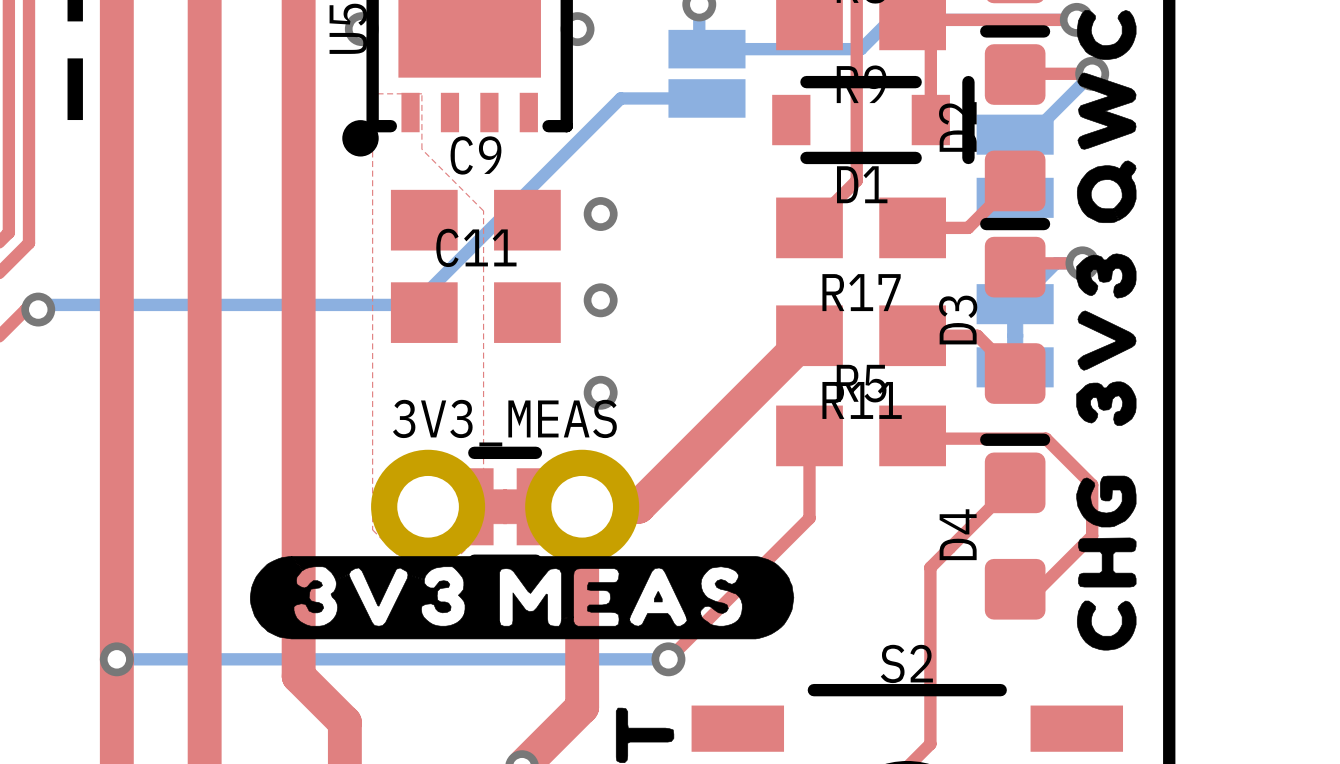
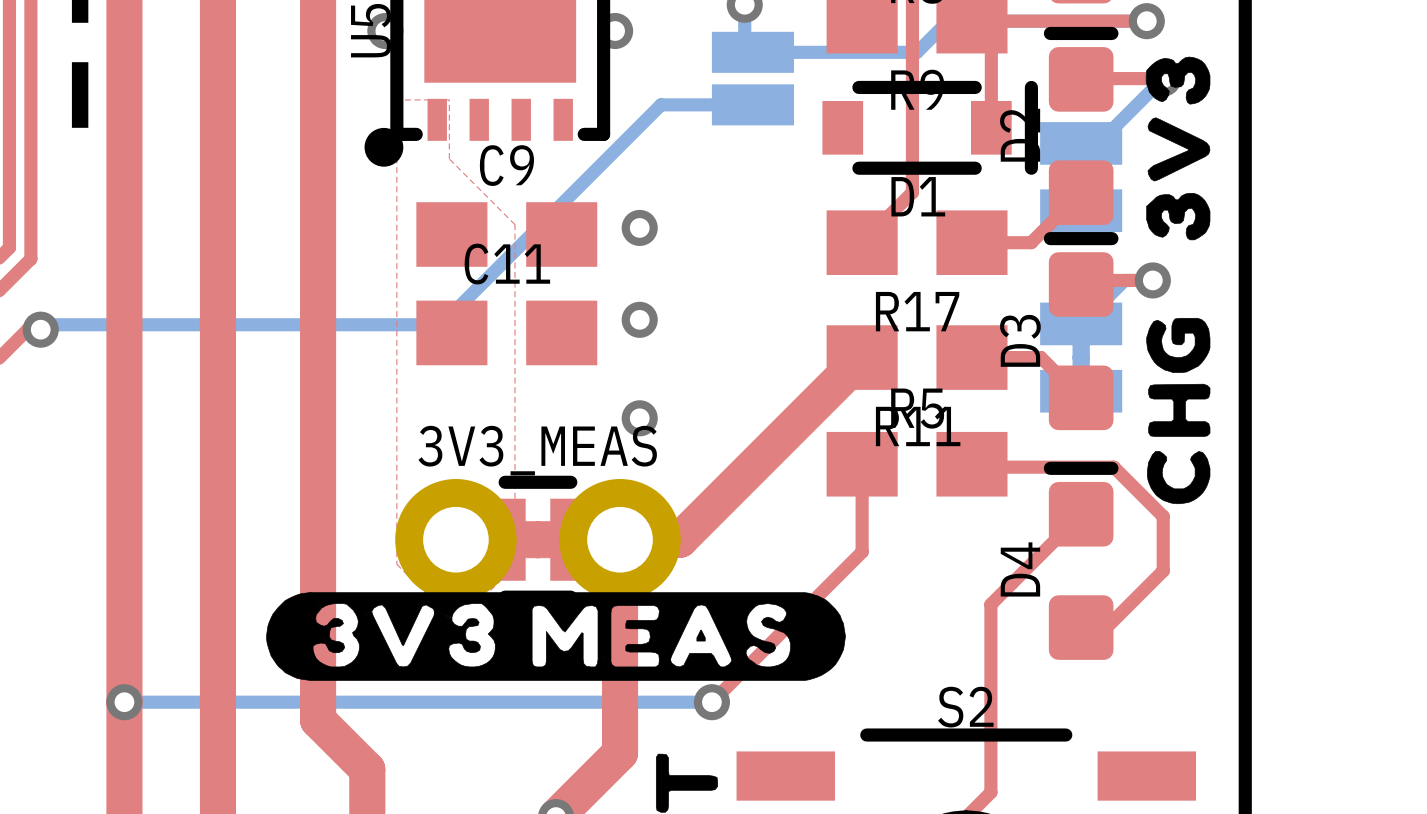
drawing: [1076, 10, 1137, 224] -> none
drawing position: (1106, 339) -> (1178, 148)
drawing position: (1106, 563) -> (1178, 411)

